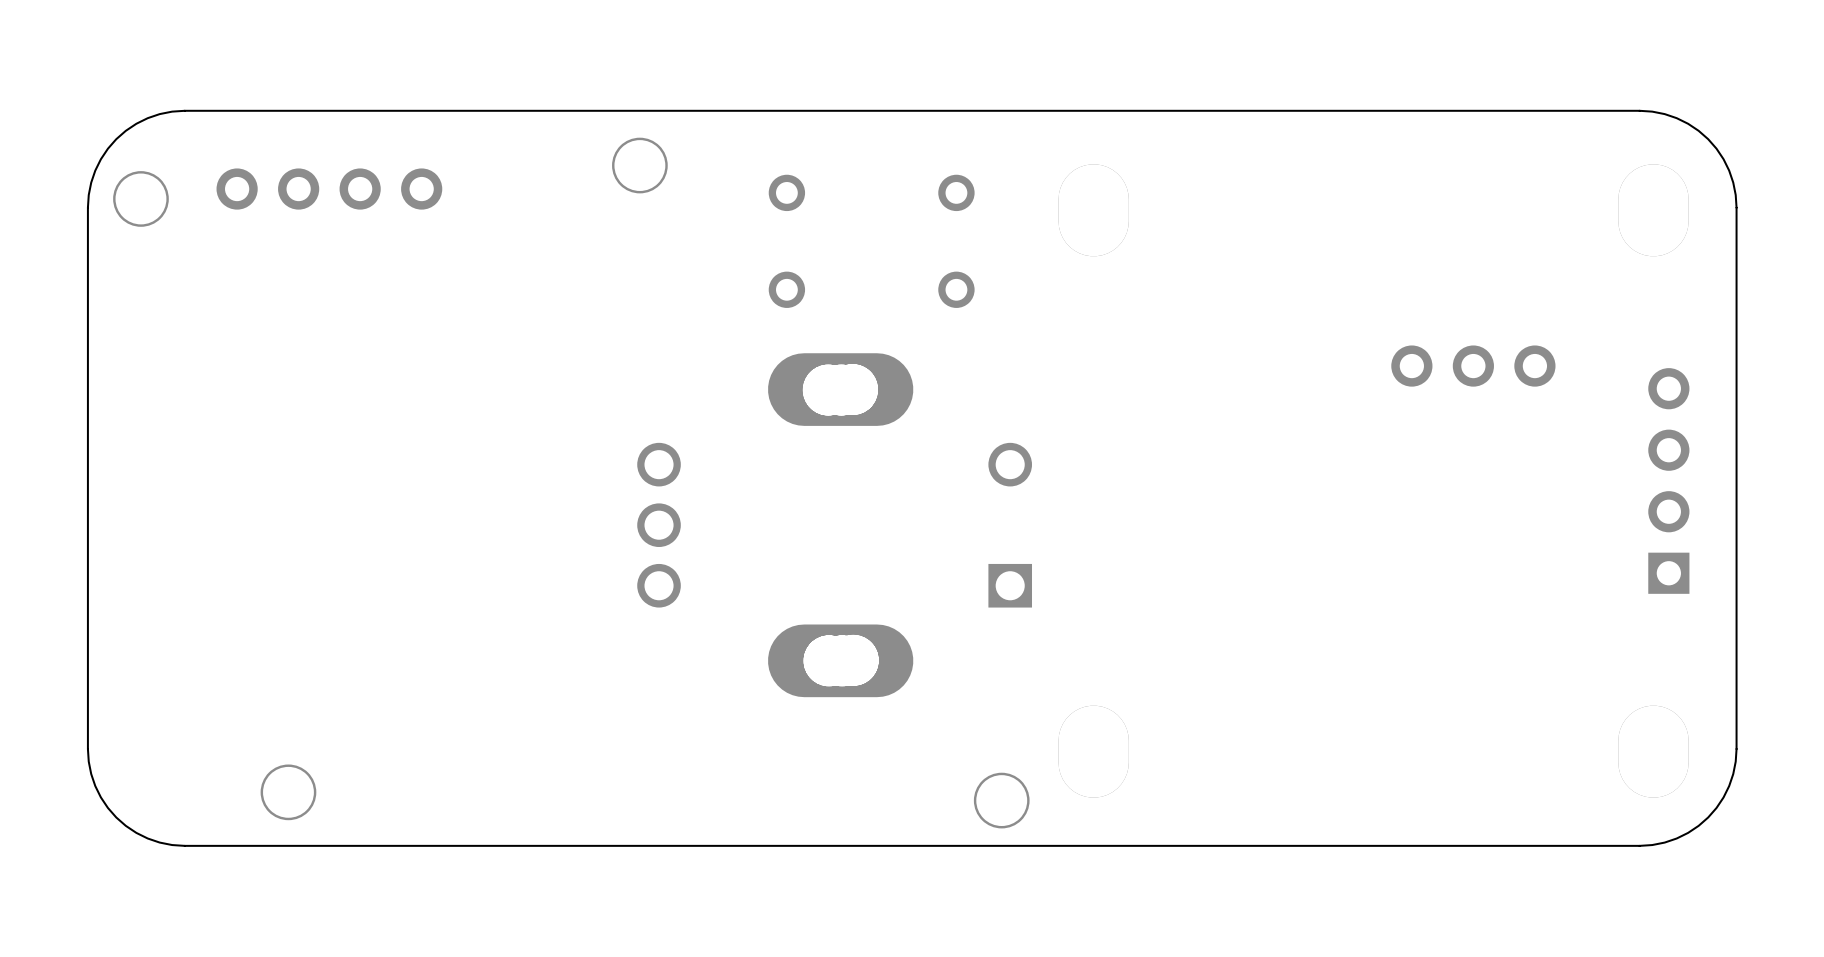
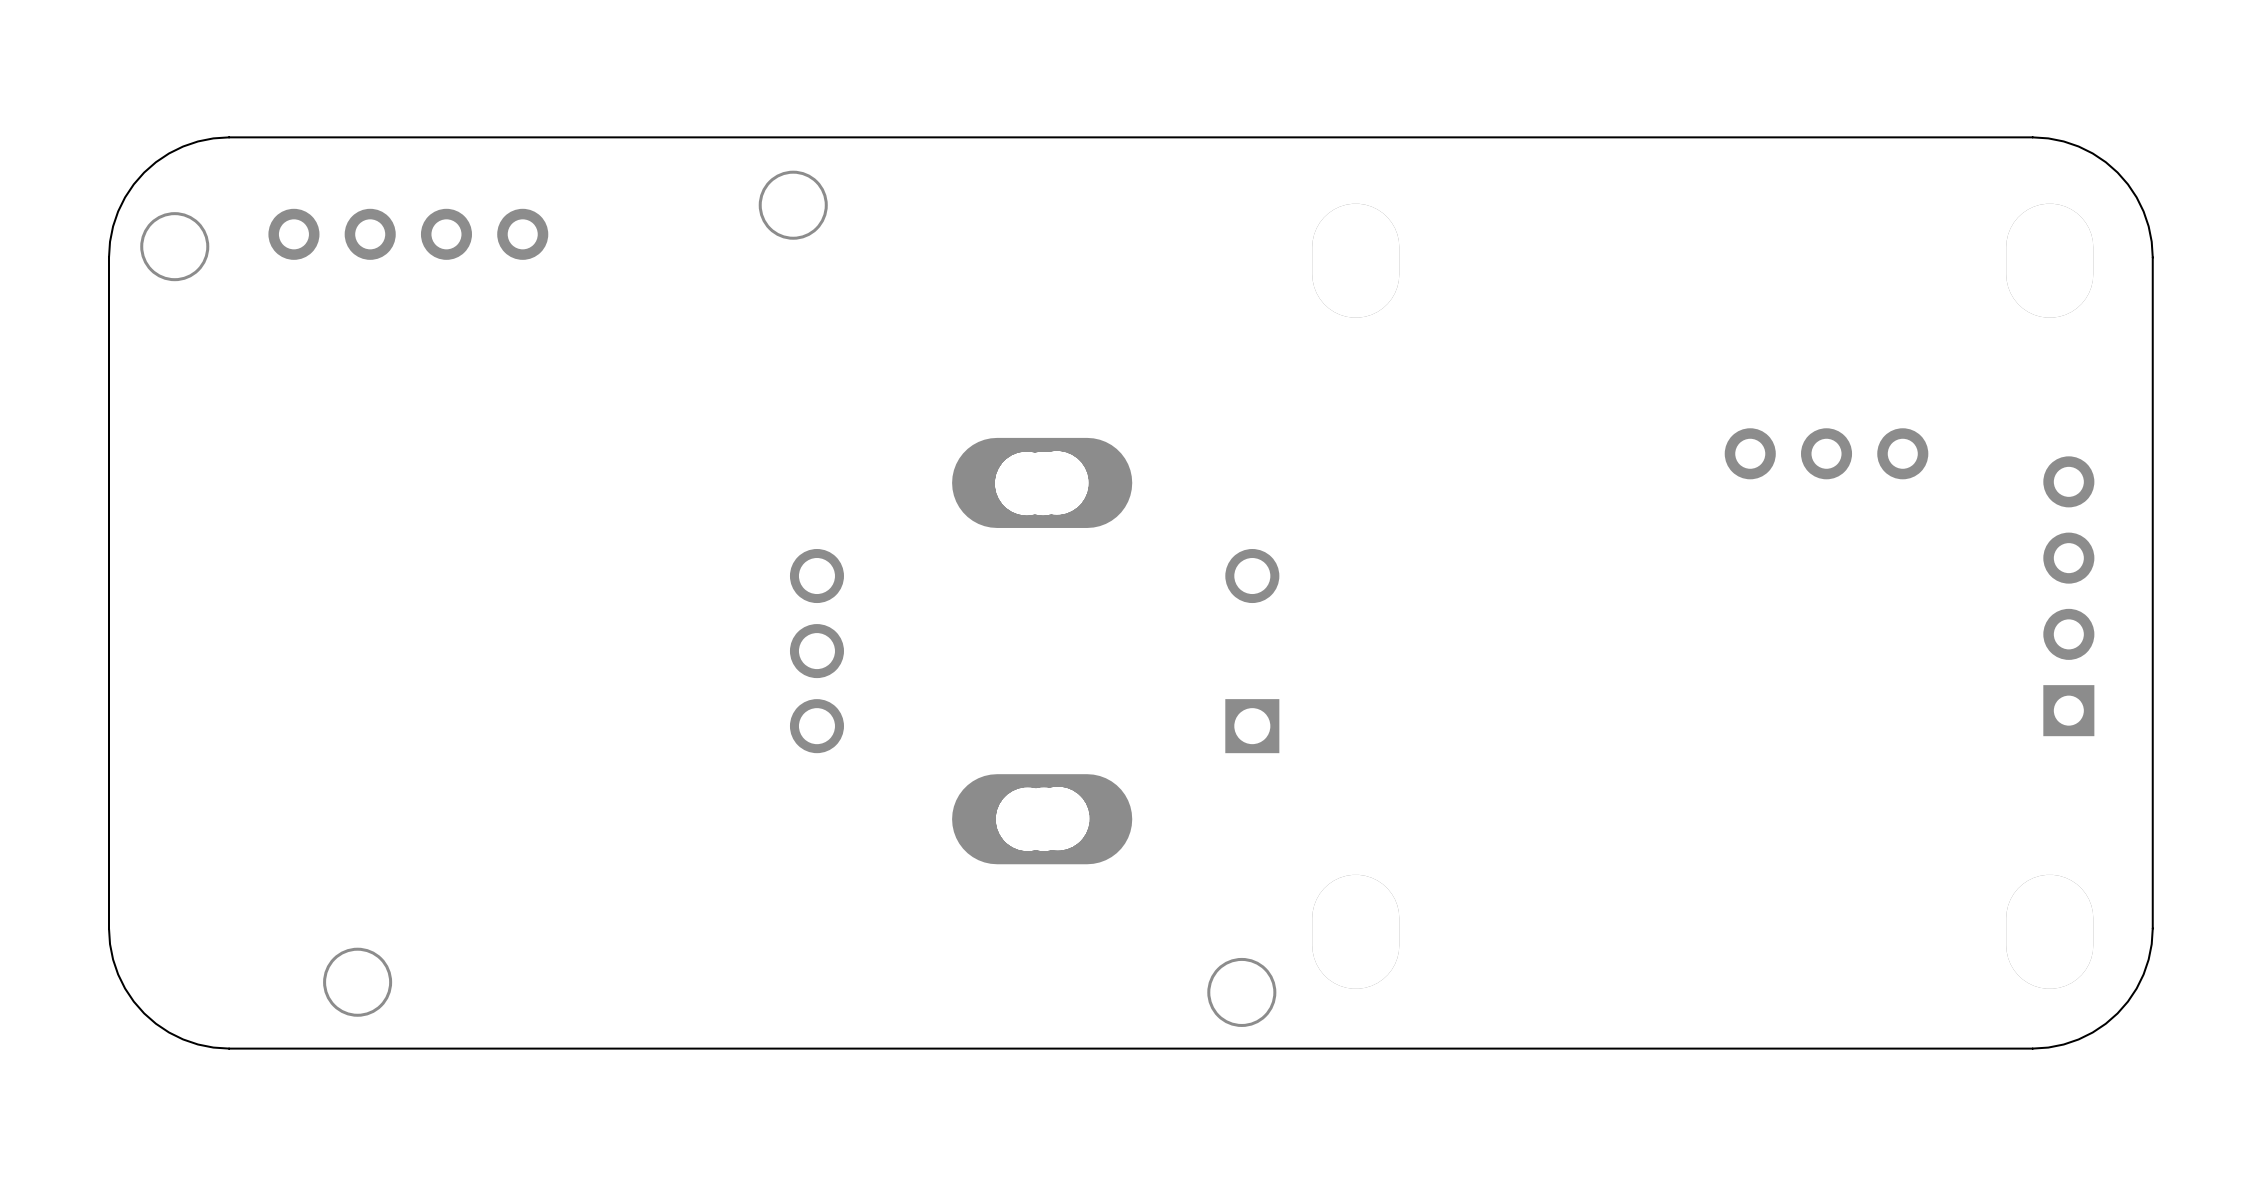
via: (786, 192) -> none
via: (956, 192) -> none
via: (786, 289) -> none
via: (956, 289) -> none

